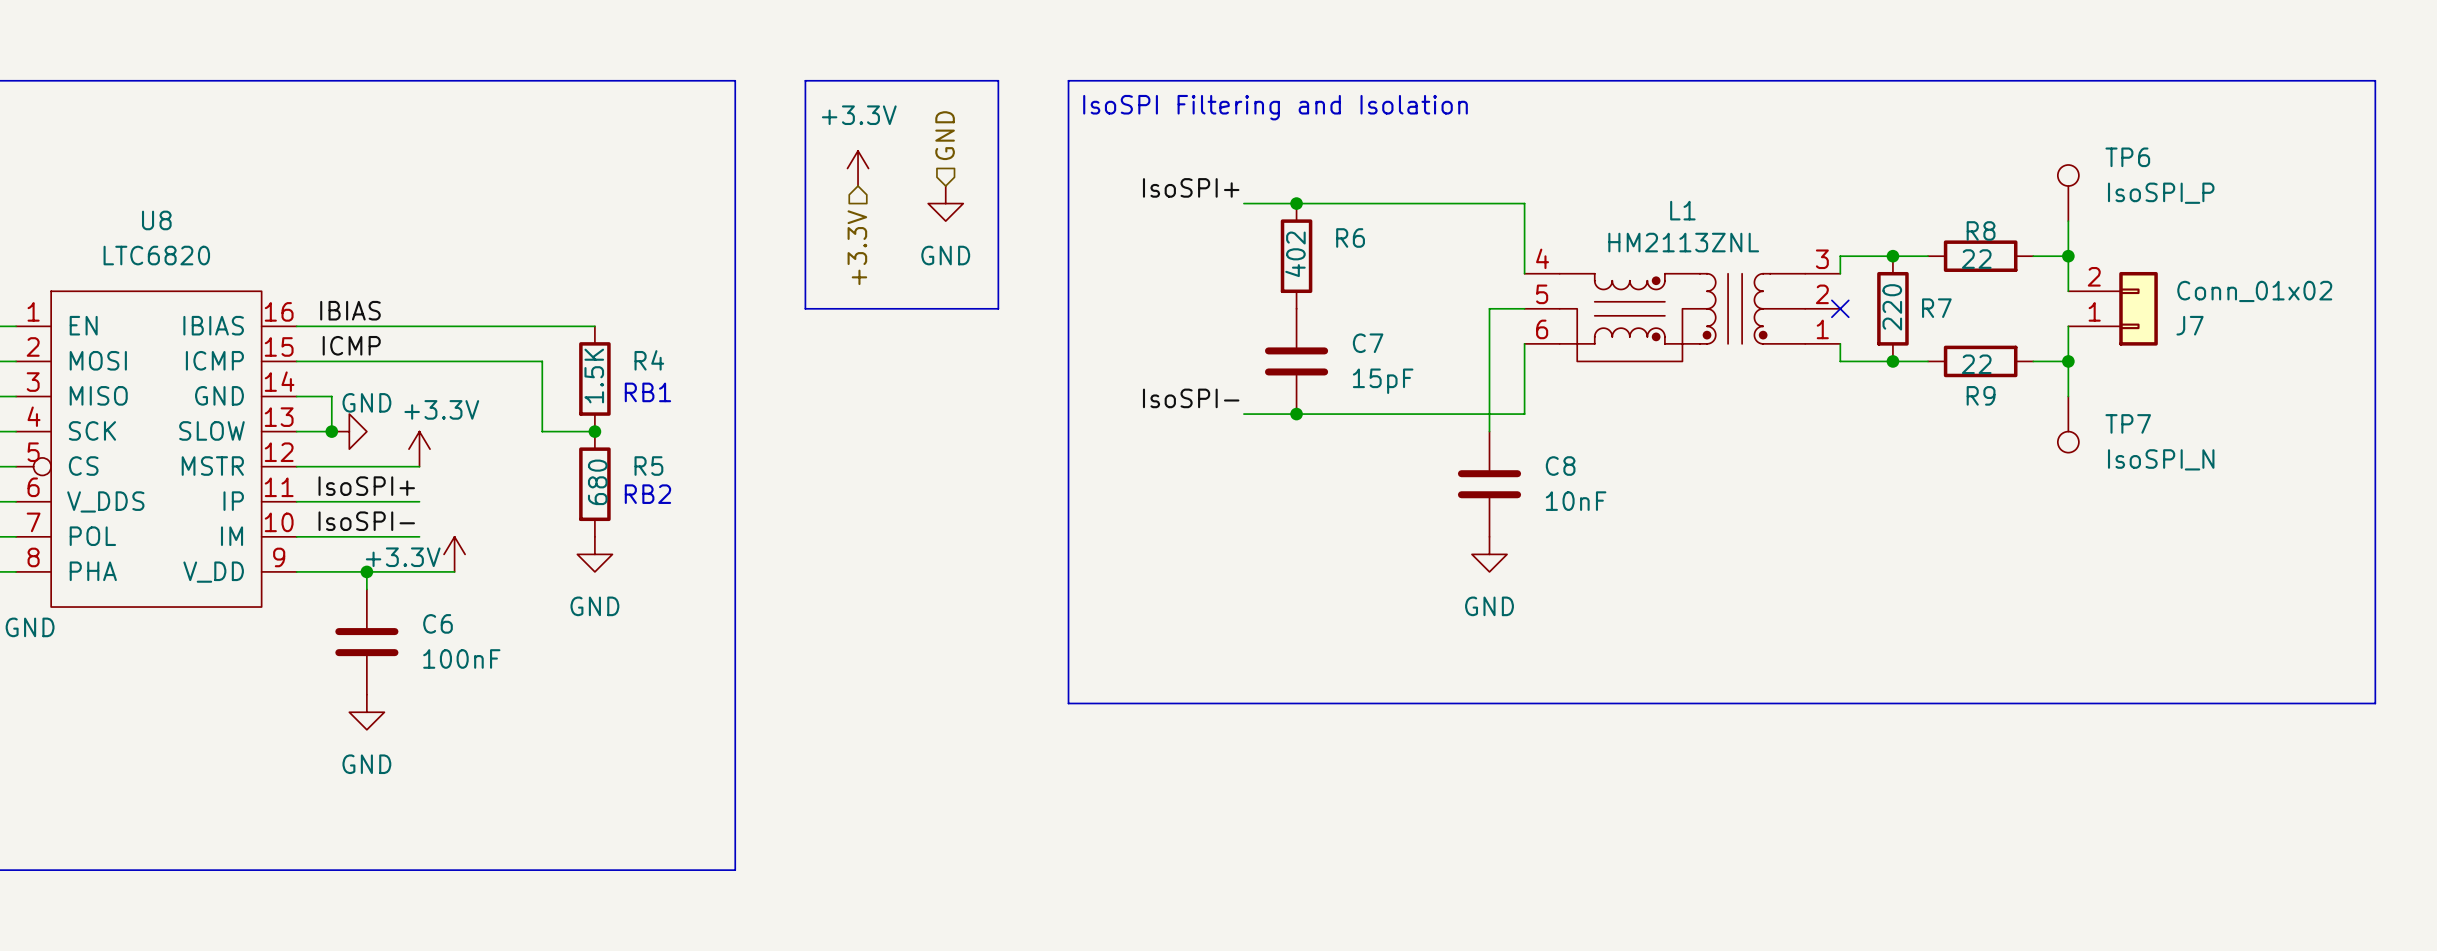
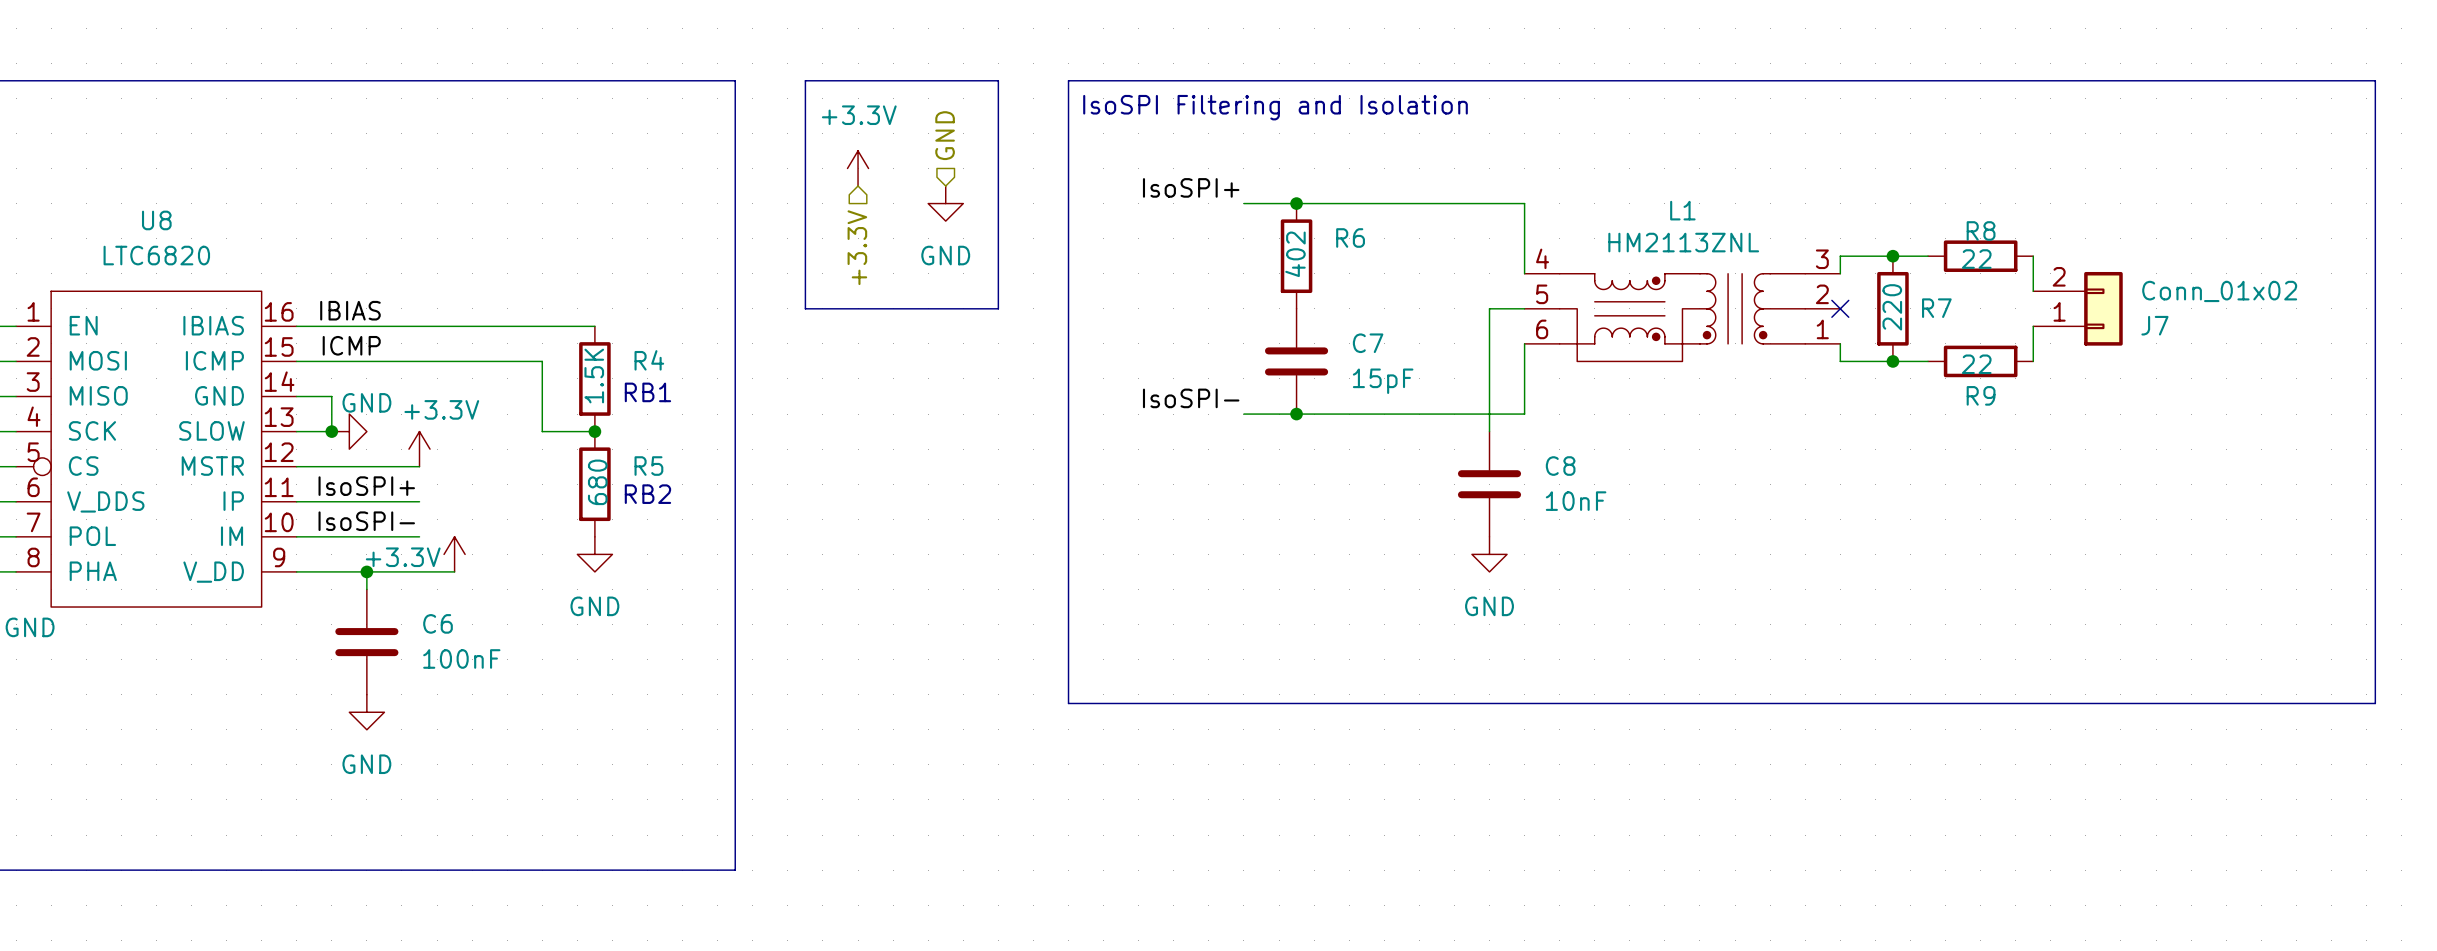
TP6: IsoSPI_P (2068, 193) -> none
wire: (2068, 221) (2068, 291) -> none
wire: (2033, 256) (2068, 256) -> (2033, 256) (2033, 291)
junction: (2068, 256) -> none
J7 position: (2113, 308) -> (2078, 308)
wire: (2068, 326) (2068, 396) -> none
wire: (2033, 361) (2068, 361) -> (2033, 361) (2033, 326)
junction: (2068, 361) -> none
TP7: IsoSPI_N (2068, 424) -> none

